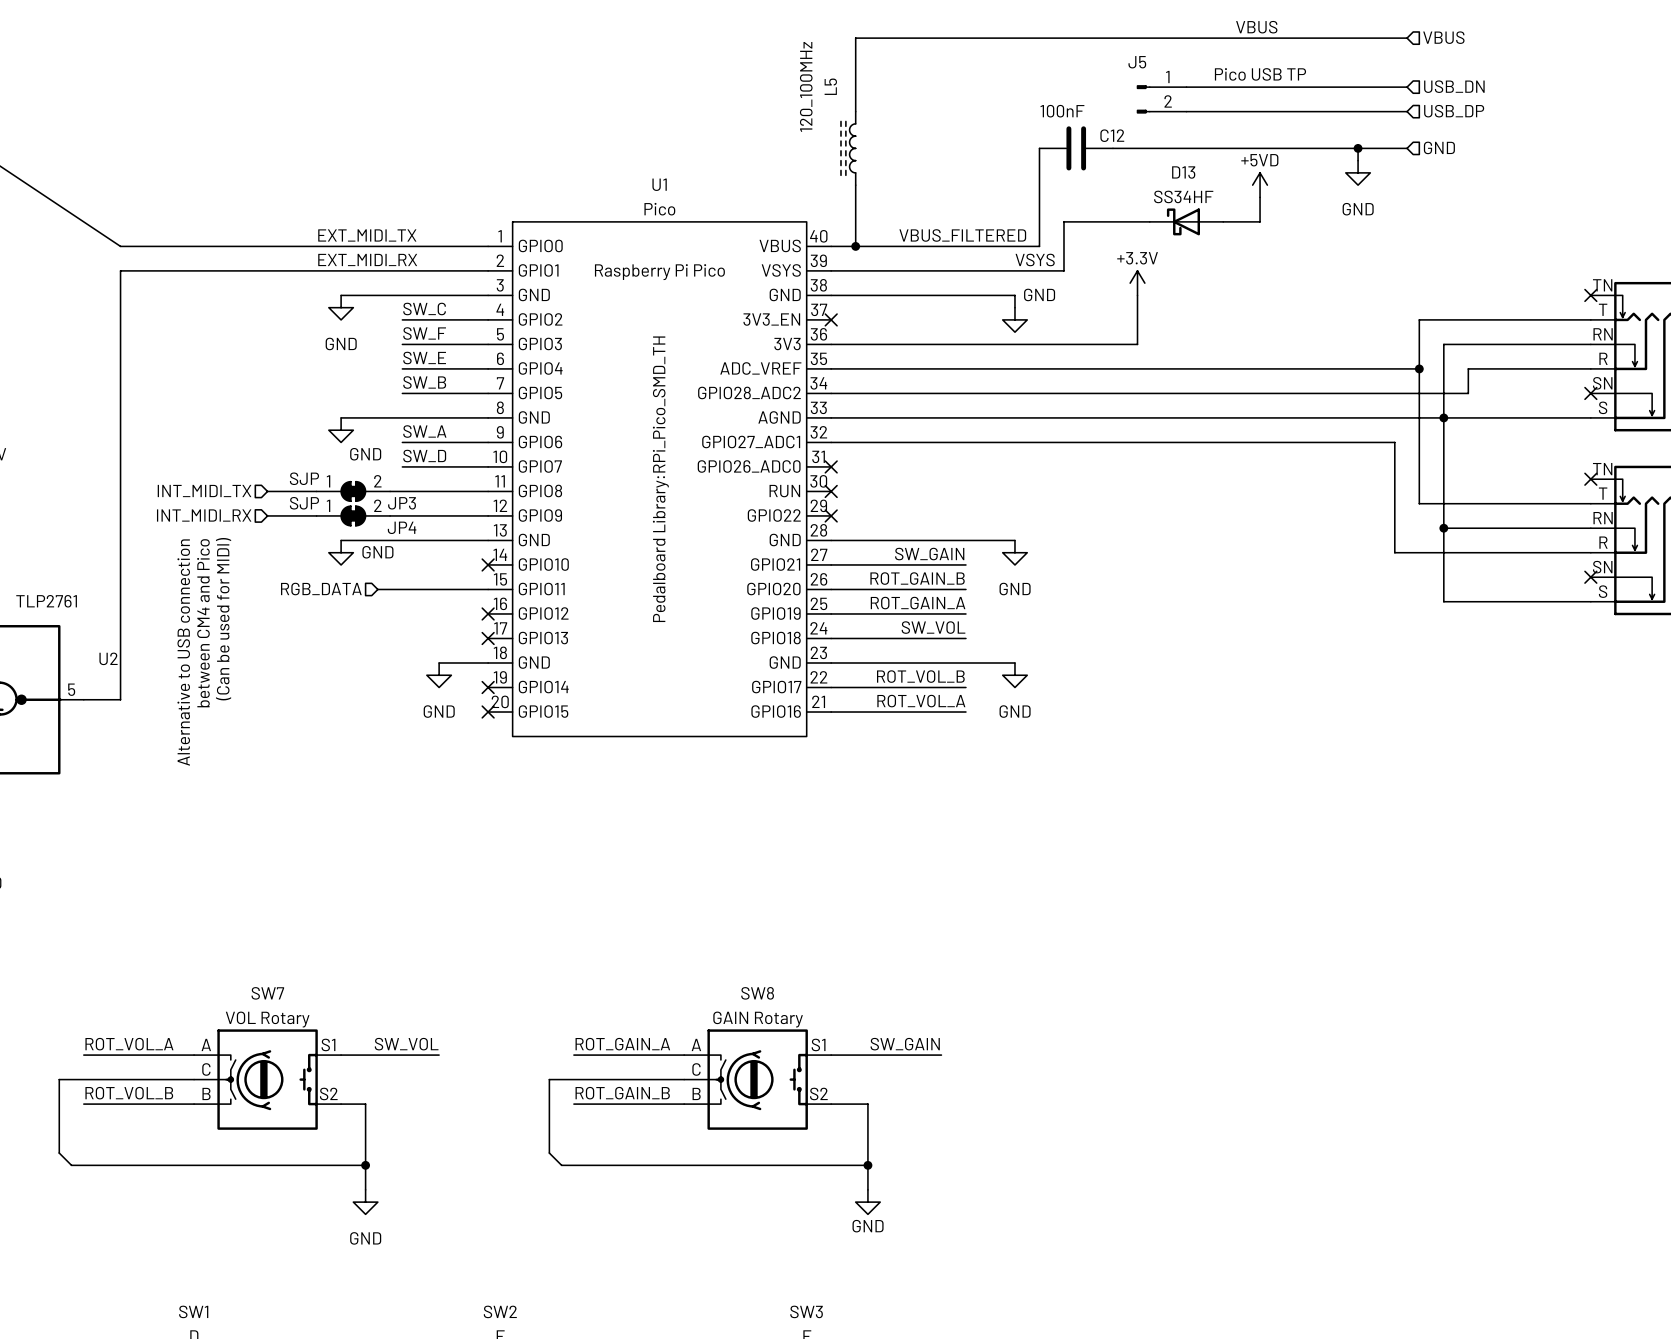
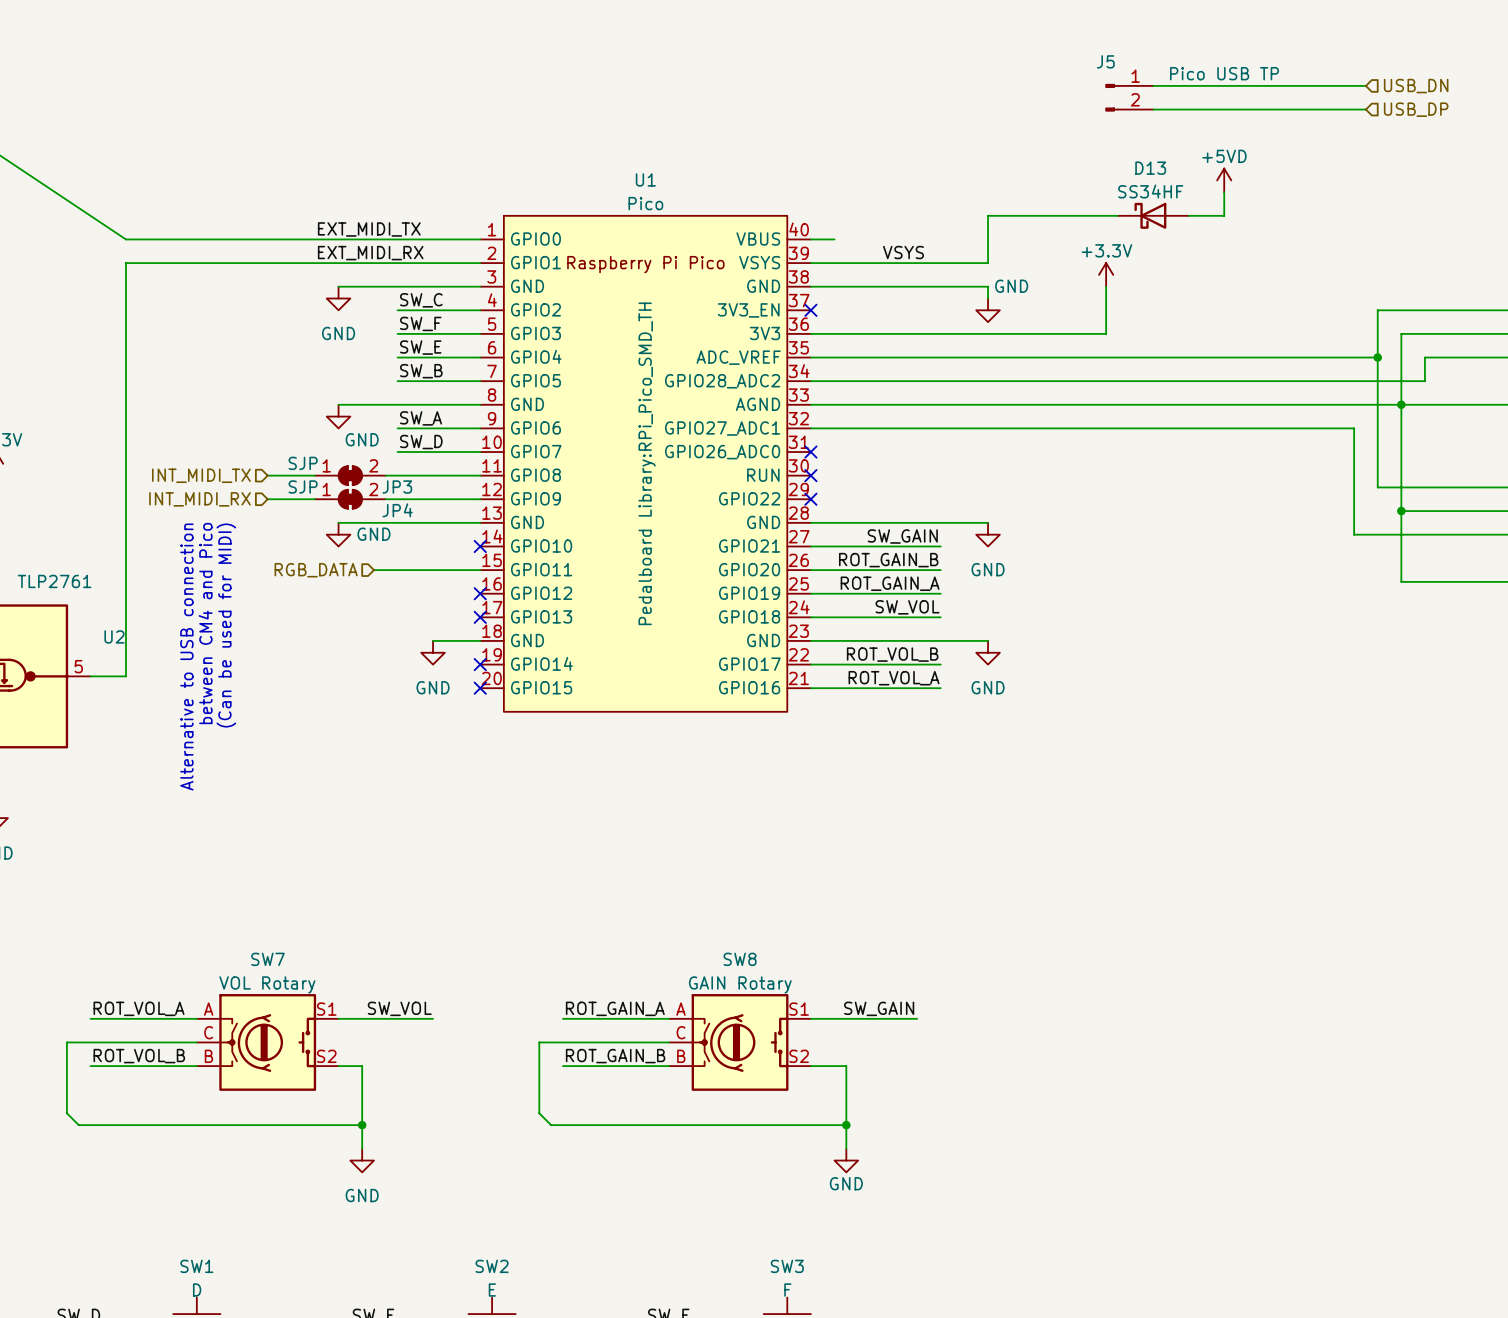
label: VBUS (1256, 27) -> none
hierarchical label: VBUS (1443, 37) -> none
wire: (1407, 38) (855, 38) (855, 111) -> none
hierarchical label: GND (1439, 147) -> none
L5: 120_100MHz (848, 148) -> none
wire: (1039, 148) (1039, 246) (855, 246) (855, 185) -> none
C12: 100nF (1076, 148) -> none
wire: (1113, 148) (1407, 148) -> none
wire: (1358, 148) (1358, 160) -> none
junction: (1358, 148) -> none
power symbol: GND (1358, 172) -> none
wire: (1063, 221) (1063, 270) (1014, 270) -> (1035, 215) (988, 215) (988, 263)
label: VBUS_FILTERED (962, 235) -> none
junction: (855, 246) -> none
label position: VSYS (1035, 259) -> VSYS (903, 252)

